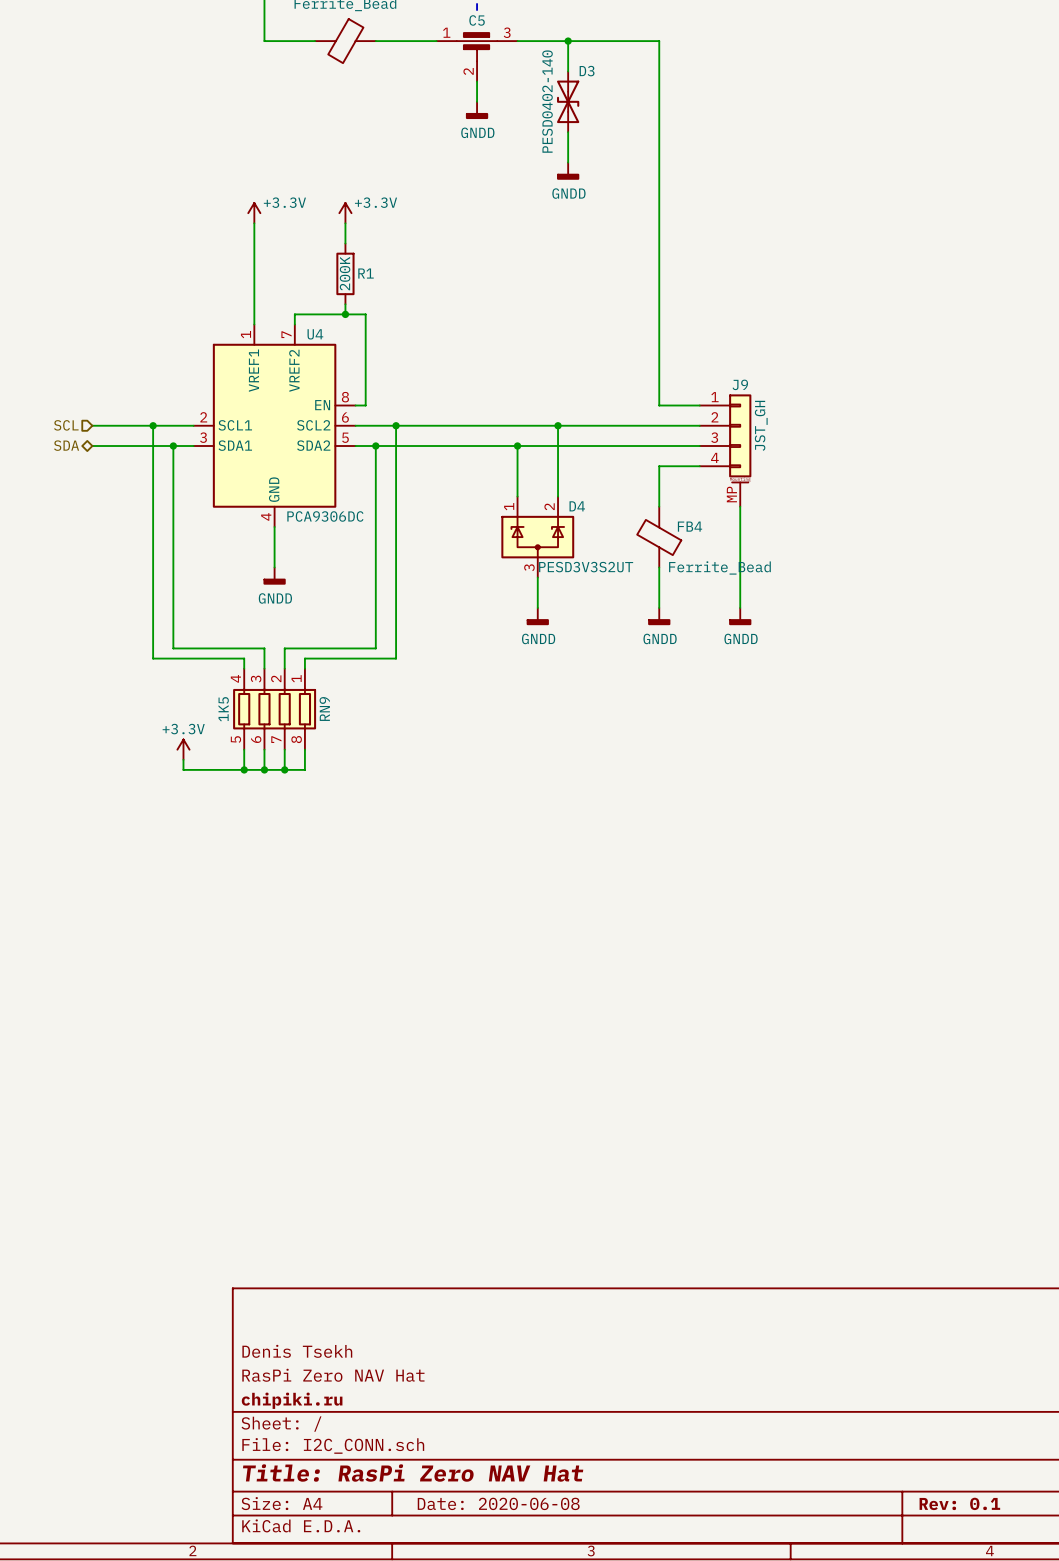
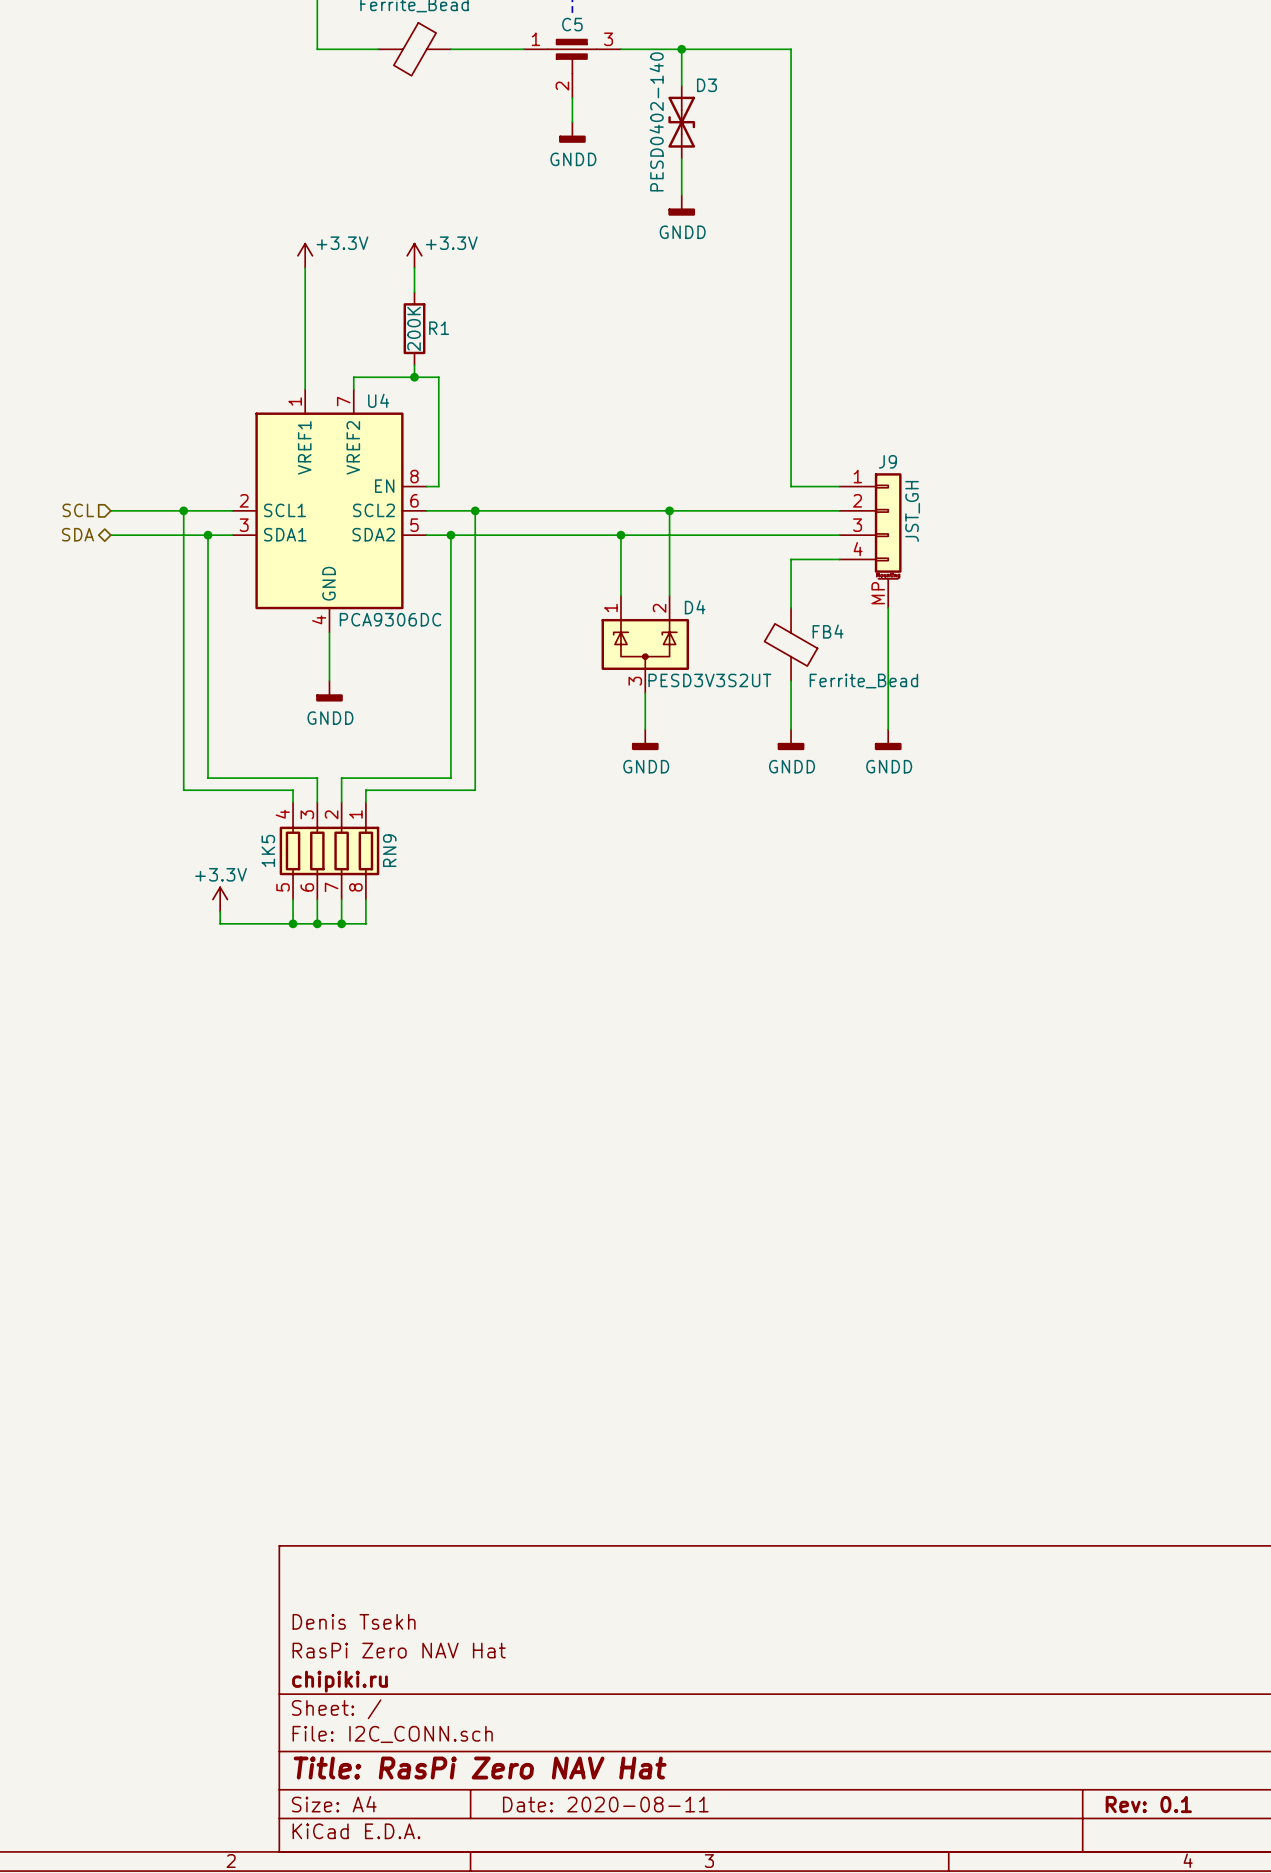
title block: Date: 2020-06-08 (498, 1503) -> Date: 2020-08-11 (605, 1804)

